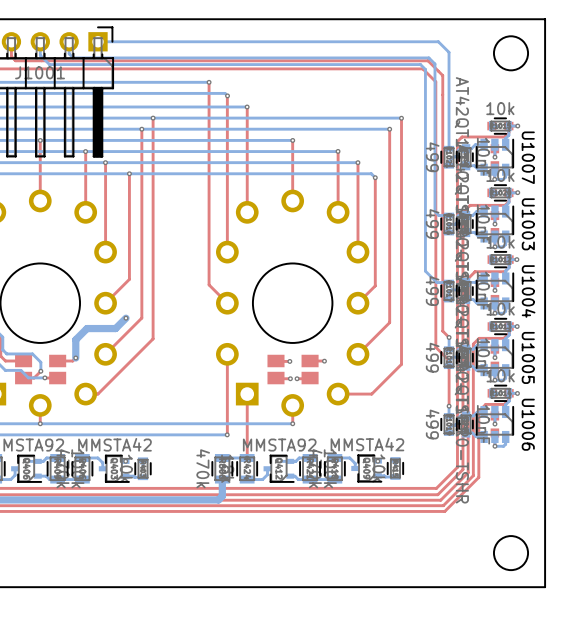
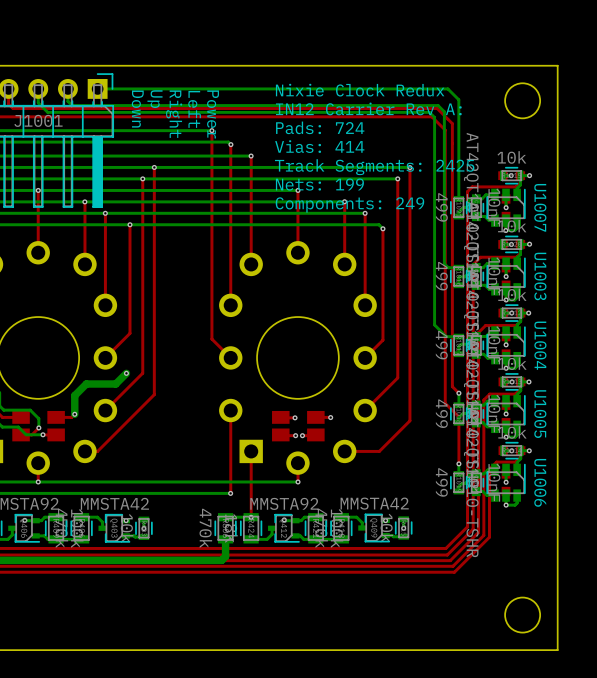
text: none -> Nixie Clock Redux (360, 90)
text: none -> Up (155, 99)
text: none -> Left (194, 109)
text: none -> IN12 Carrier Rev A: (368, 108)
text: none -> Down (137, 109)
text: none -> Right (174, 114)
text: none -> Power (213, 114)
text: none -> Pads: 724 (320, 127)
text: none -> Vias: 414 (319, 146)
text: none -> Track Segments: 2425 (374, 167)
text: none -> Nets: 199 (319, 184)
text: none -> Components: 249 (349, 204)

